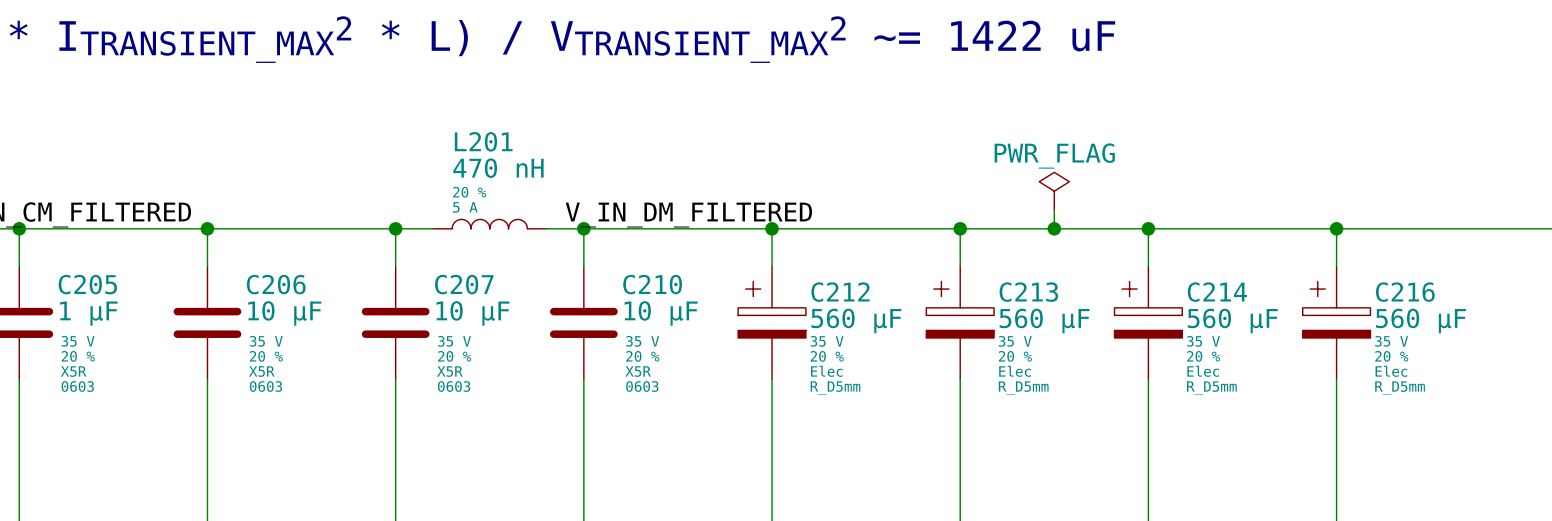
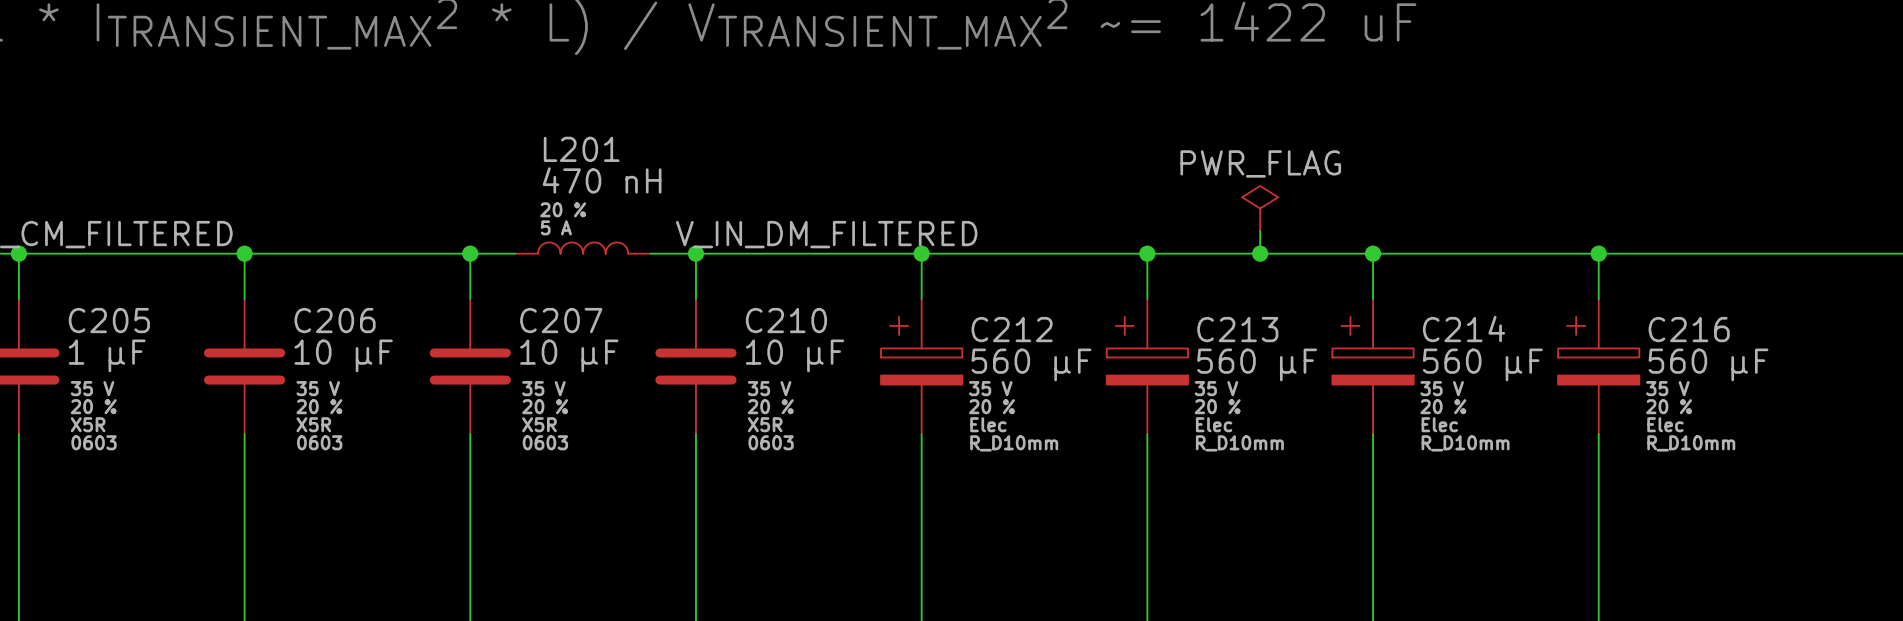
C212 text: R_D5mm (835, 388) -> R_D10mm (1014, 443)
C213 text: R_D5mm (1023, 388) -> R_D10mm (1239, 443)
C214 text: R_D5mm (1211, 388) -> R_D10mm (1465, 443)
C216 text: R_D5mm (1400, 388) -> R_D10mm (1691, 443)

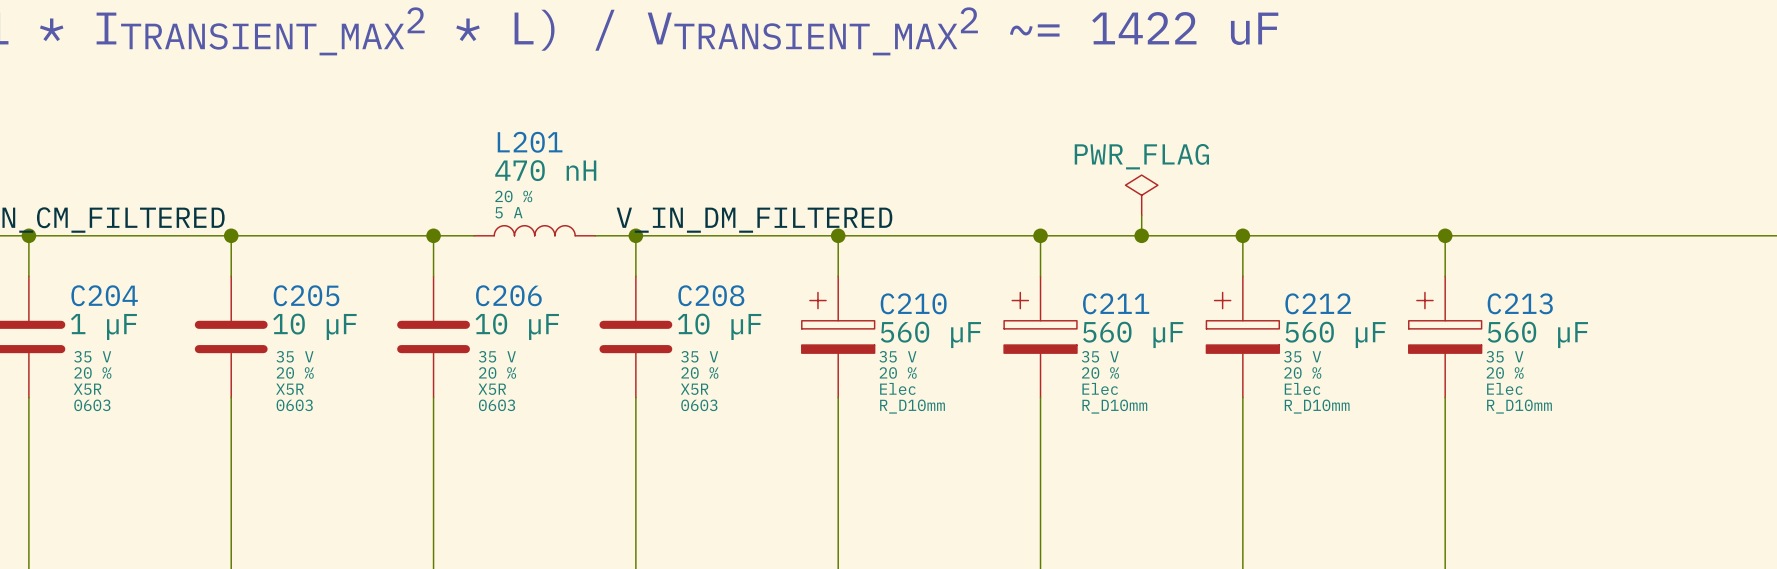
C205 name: C205 (109, 320) -> C204 (104, 295)
C206 name: C206 (335, 320) -> C205 (306, 295)
C207 name: C207 (561, 320) -> C206 (508, 295)
C210 name: C210 (786, 320) -> C208 (711, 295)
C212 name: C212 (1012, 329) -> C210 (913, 303)
C213 name: C213 (1237, 329) -> C211 (1116, 303)
C214 name: C214 (1464, 329) -> C212 (1318, 303)
C216 name: C216 (1689, 329) -> C213 (1520, 303)

